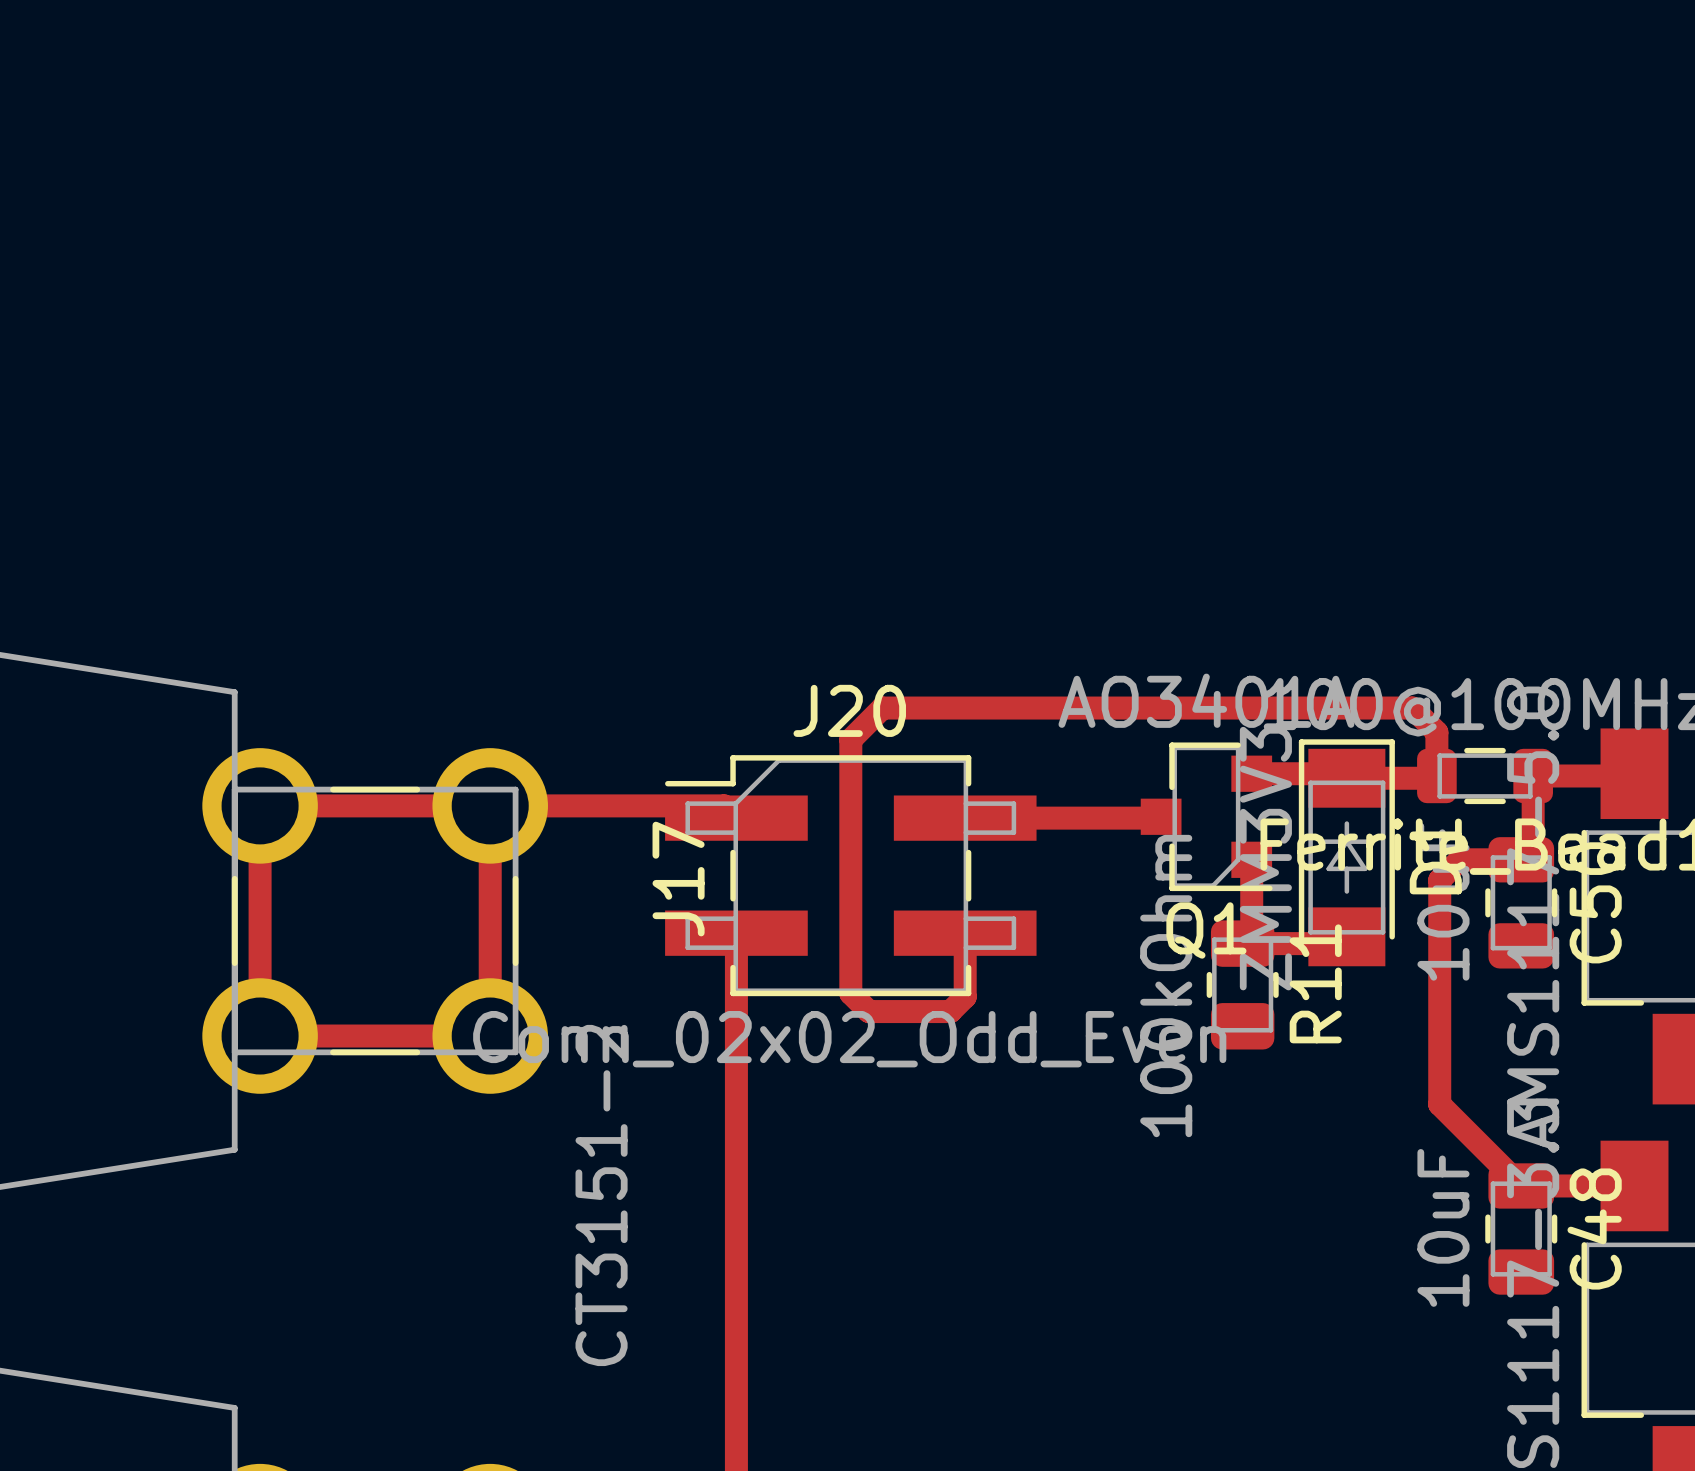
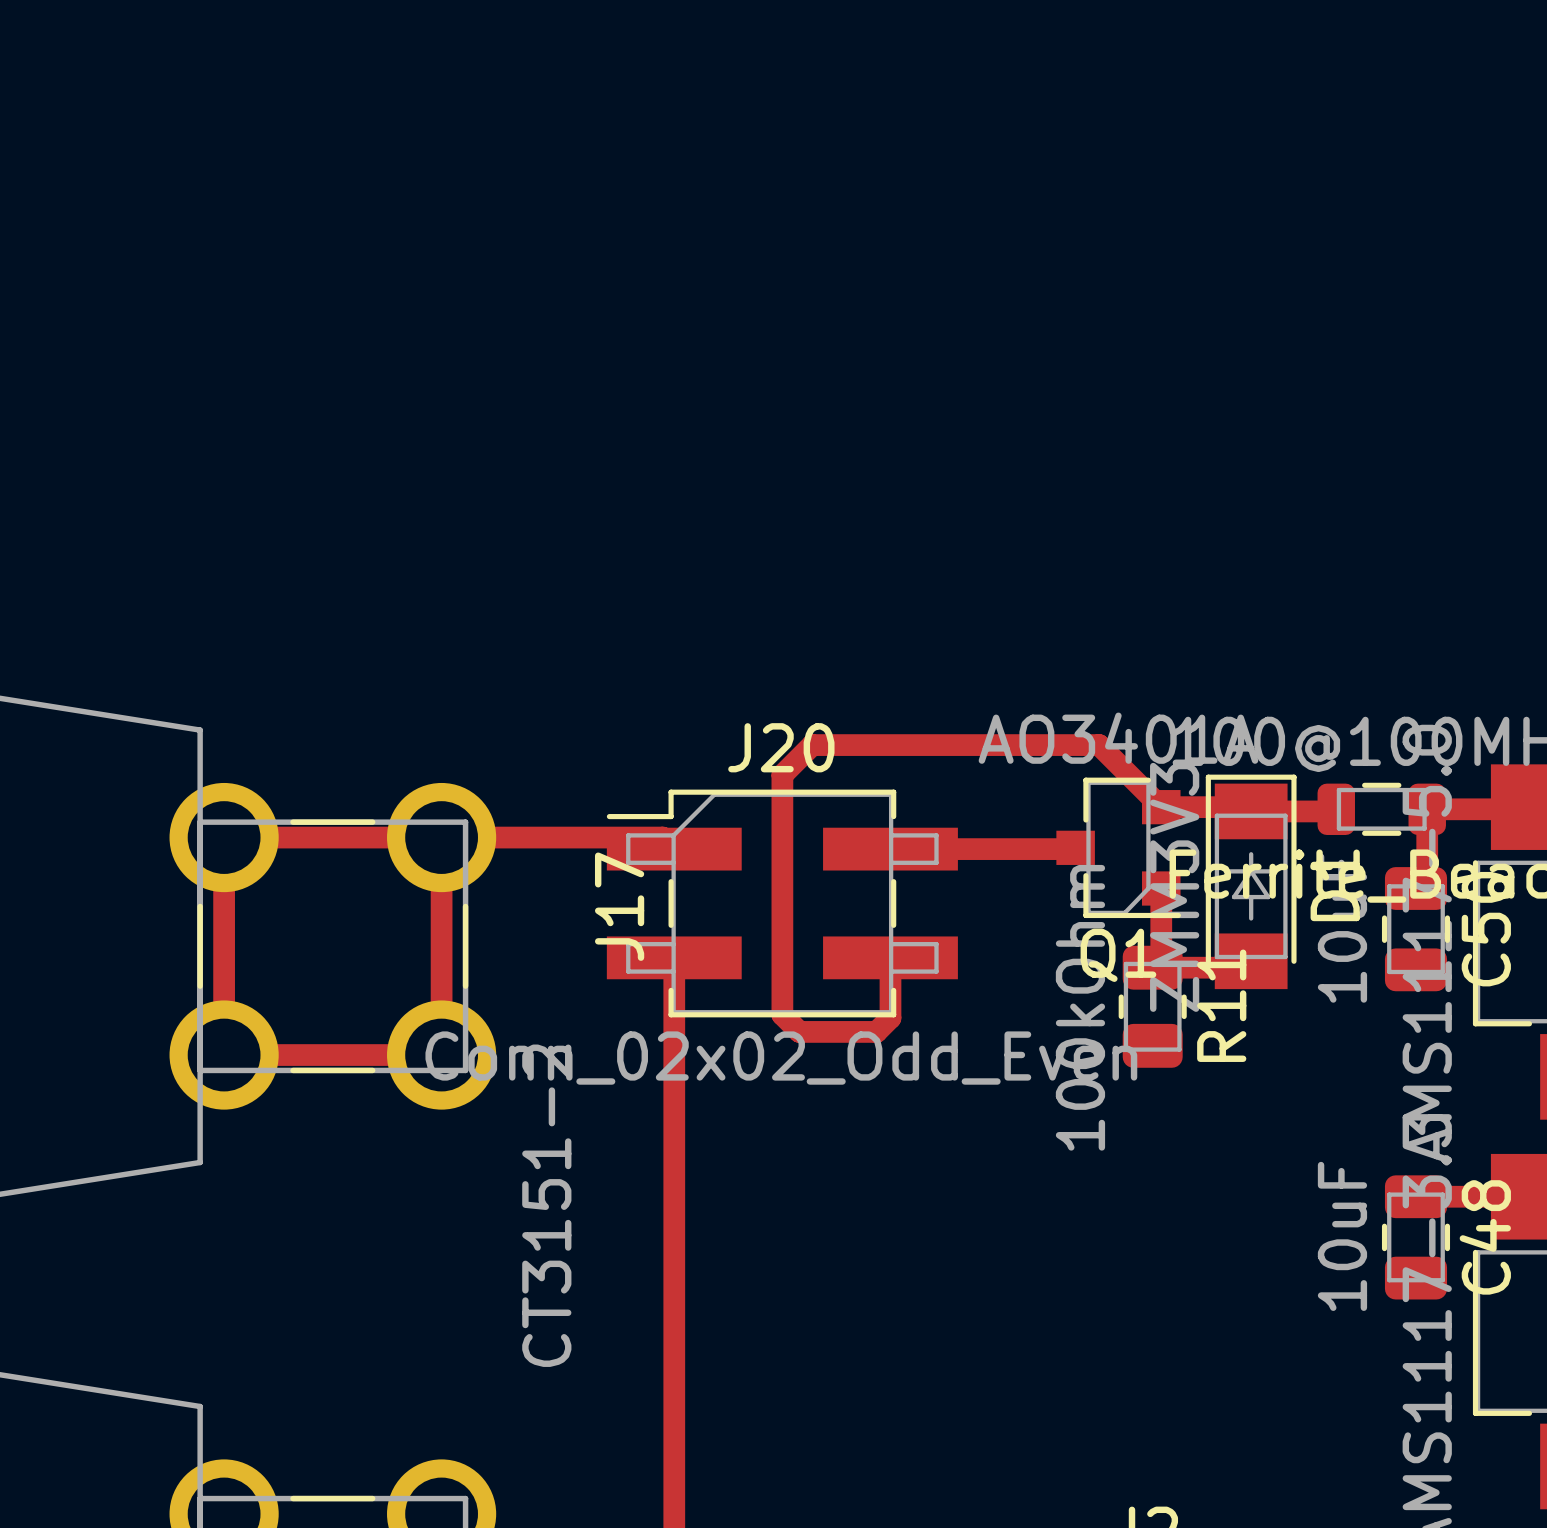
top track: (1186, 708) (1412, 708) (1436, 732) (1436, 775) -> (1099, 745) (1161, 807)
top track: (1521, 859) (1460, 859) (1439, 880) (1439, 1104) (1521, 1185) -> none

